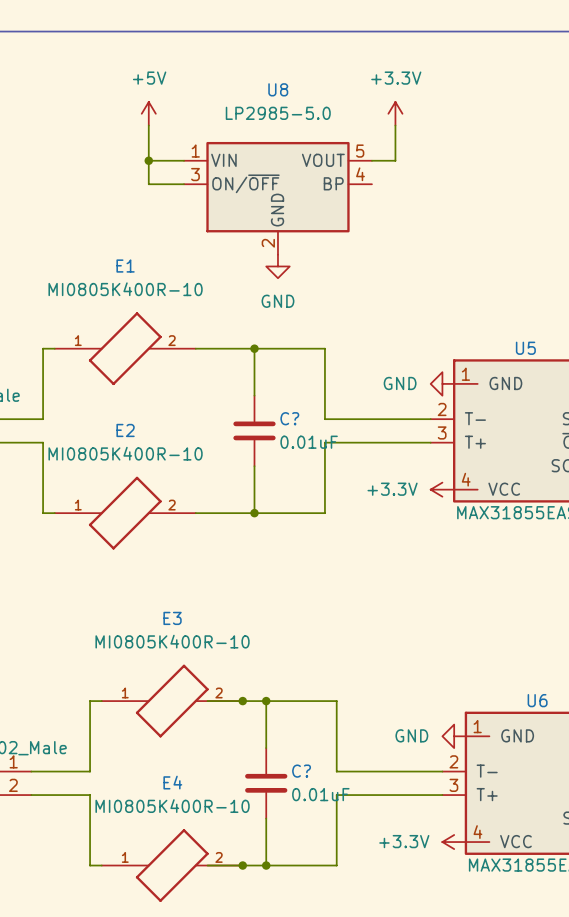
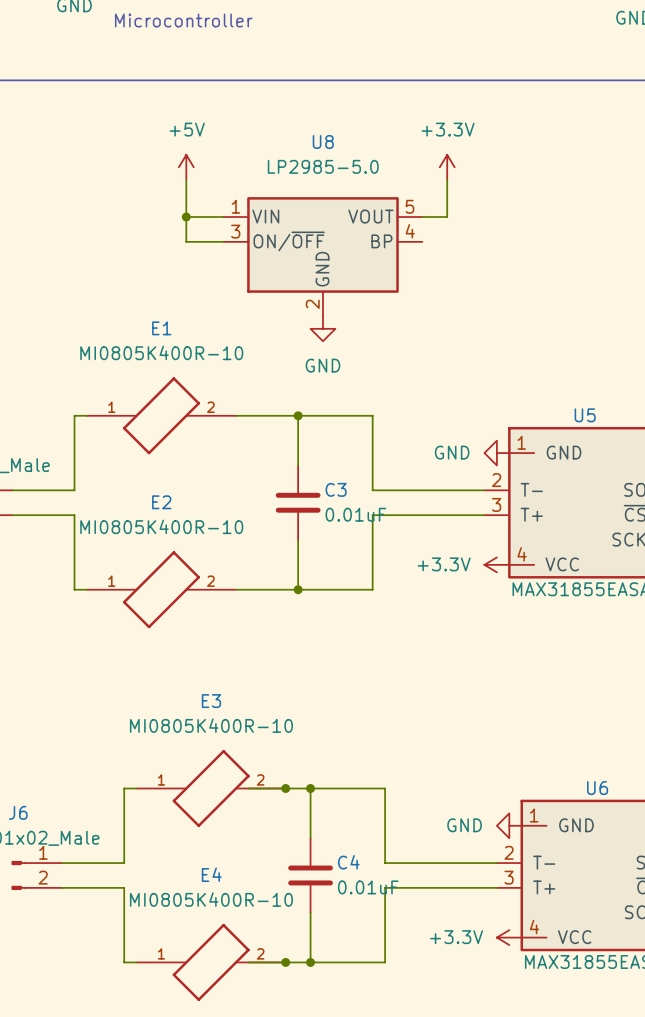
C? name: C? (289, 418) -> C3 (336, 489)
C? name: C? (301, 771) -> C4 (348, 862)

